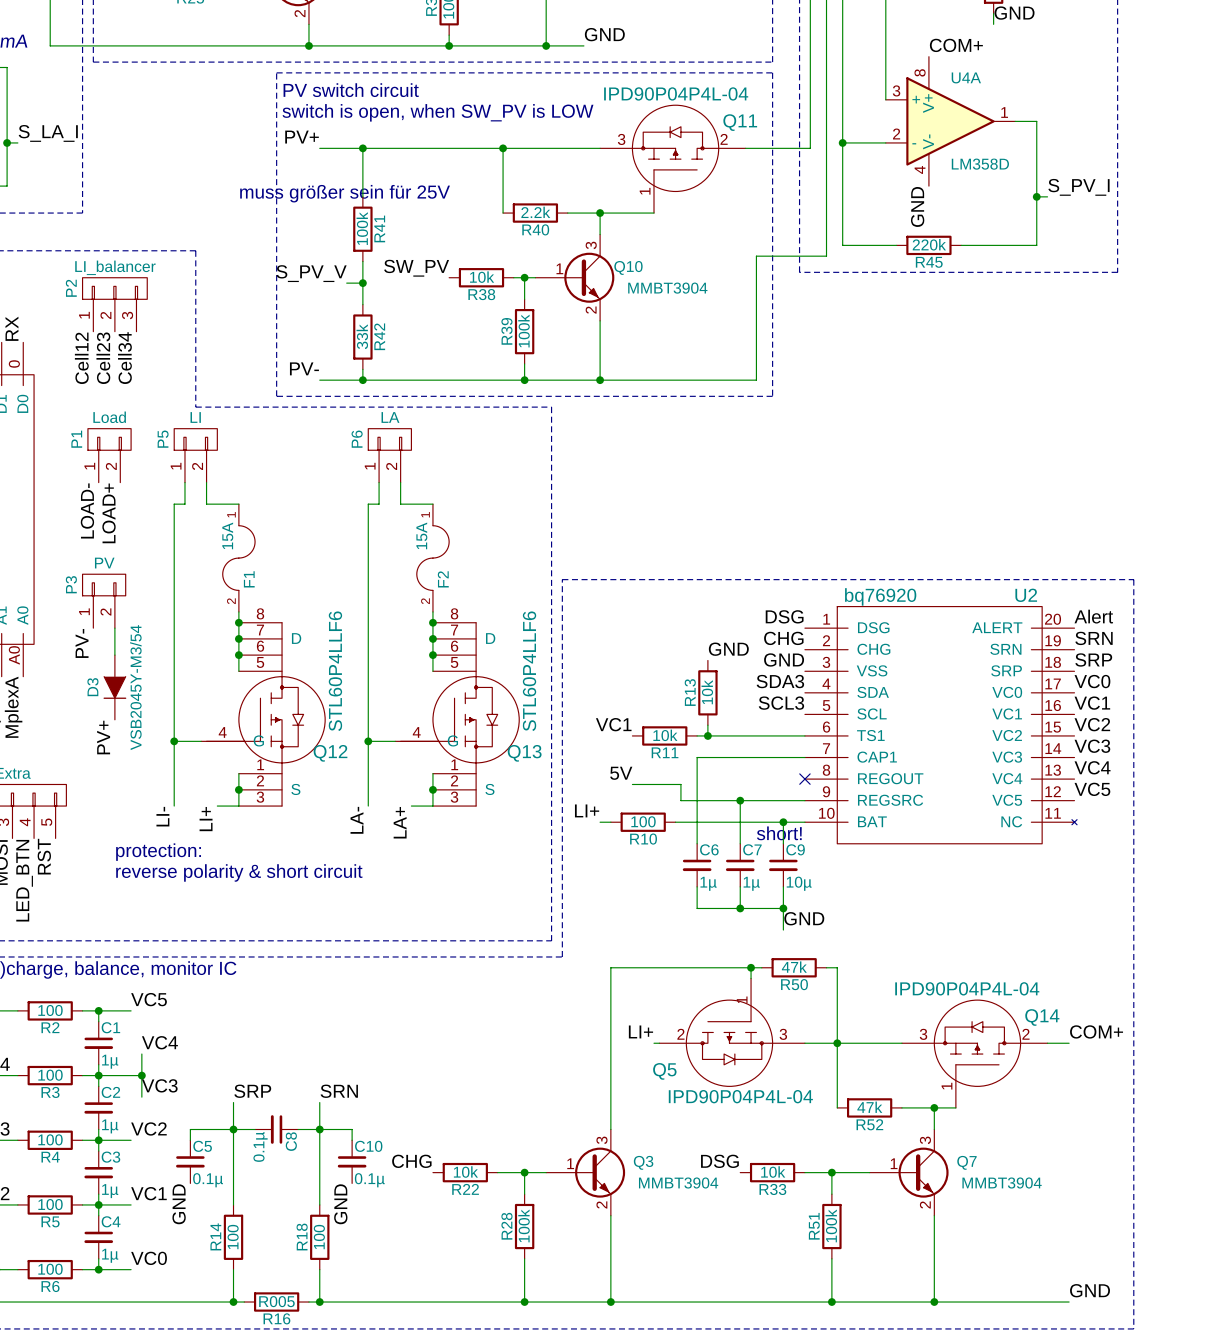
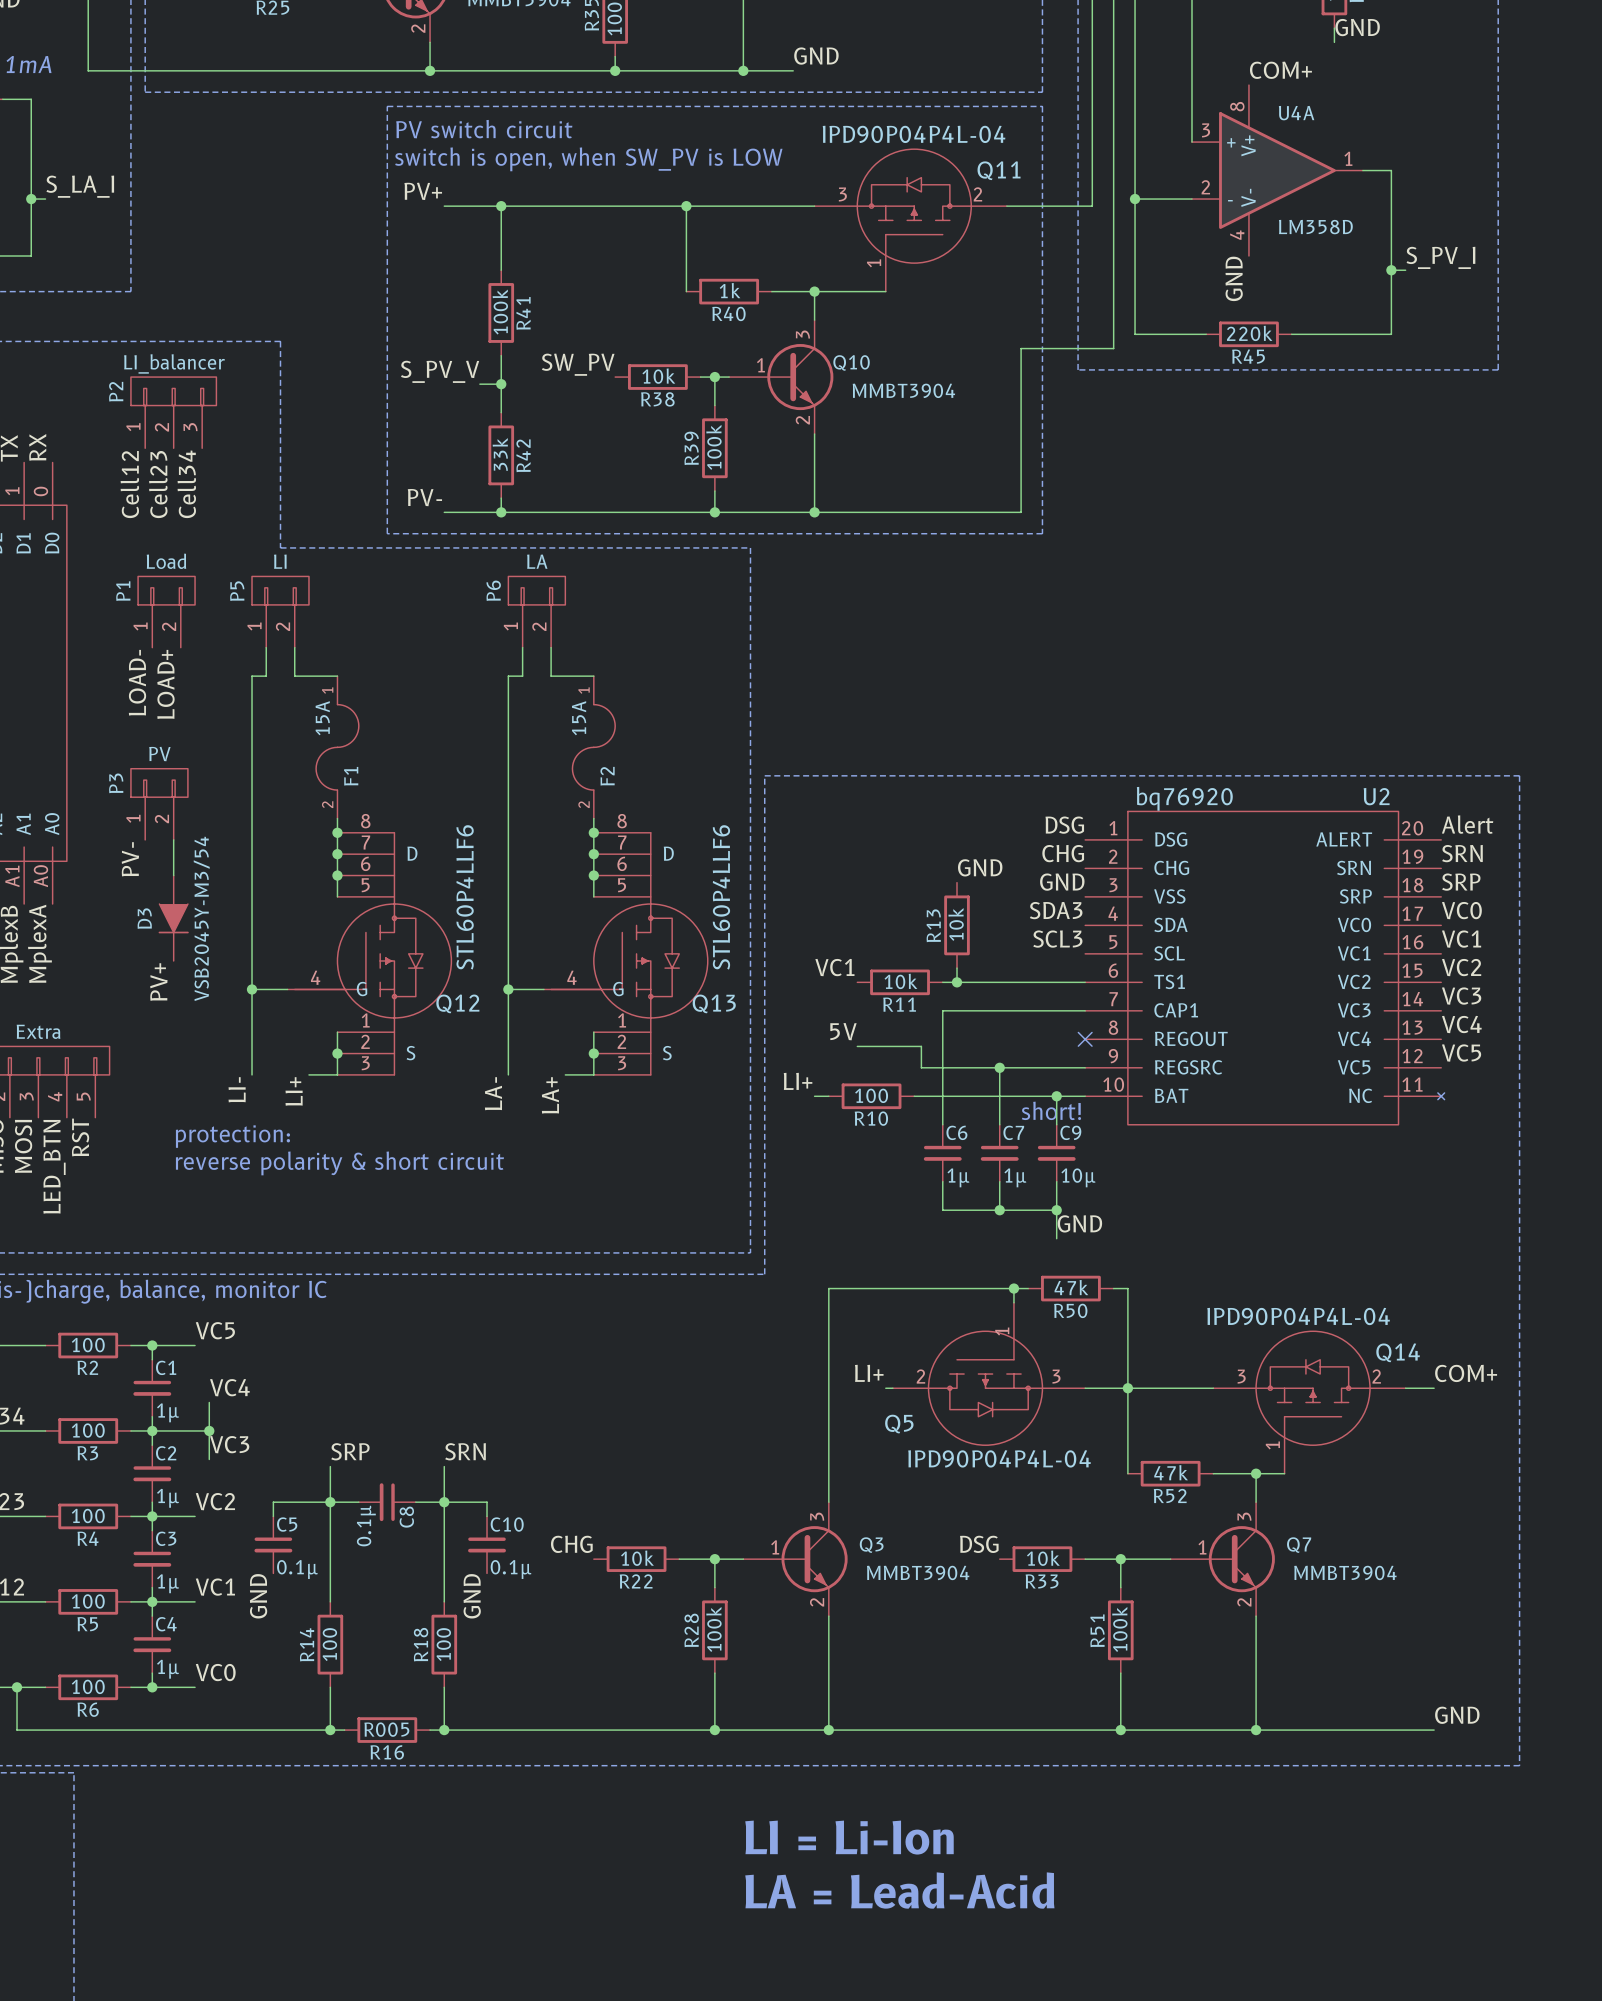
text: muss größer sein für 25V (345, 193) -> none
R40 value: 2.2k (535, 212) -> 1k (730, 290)

